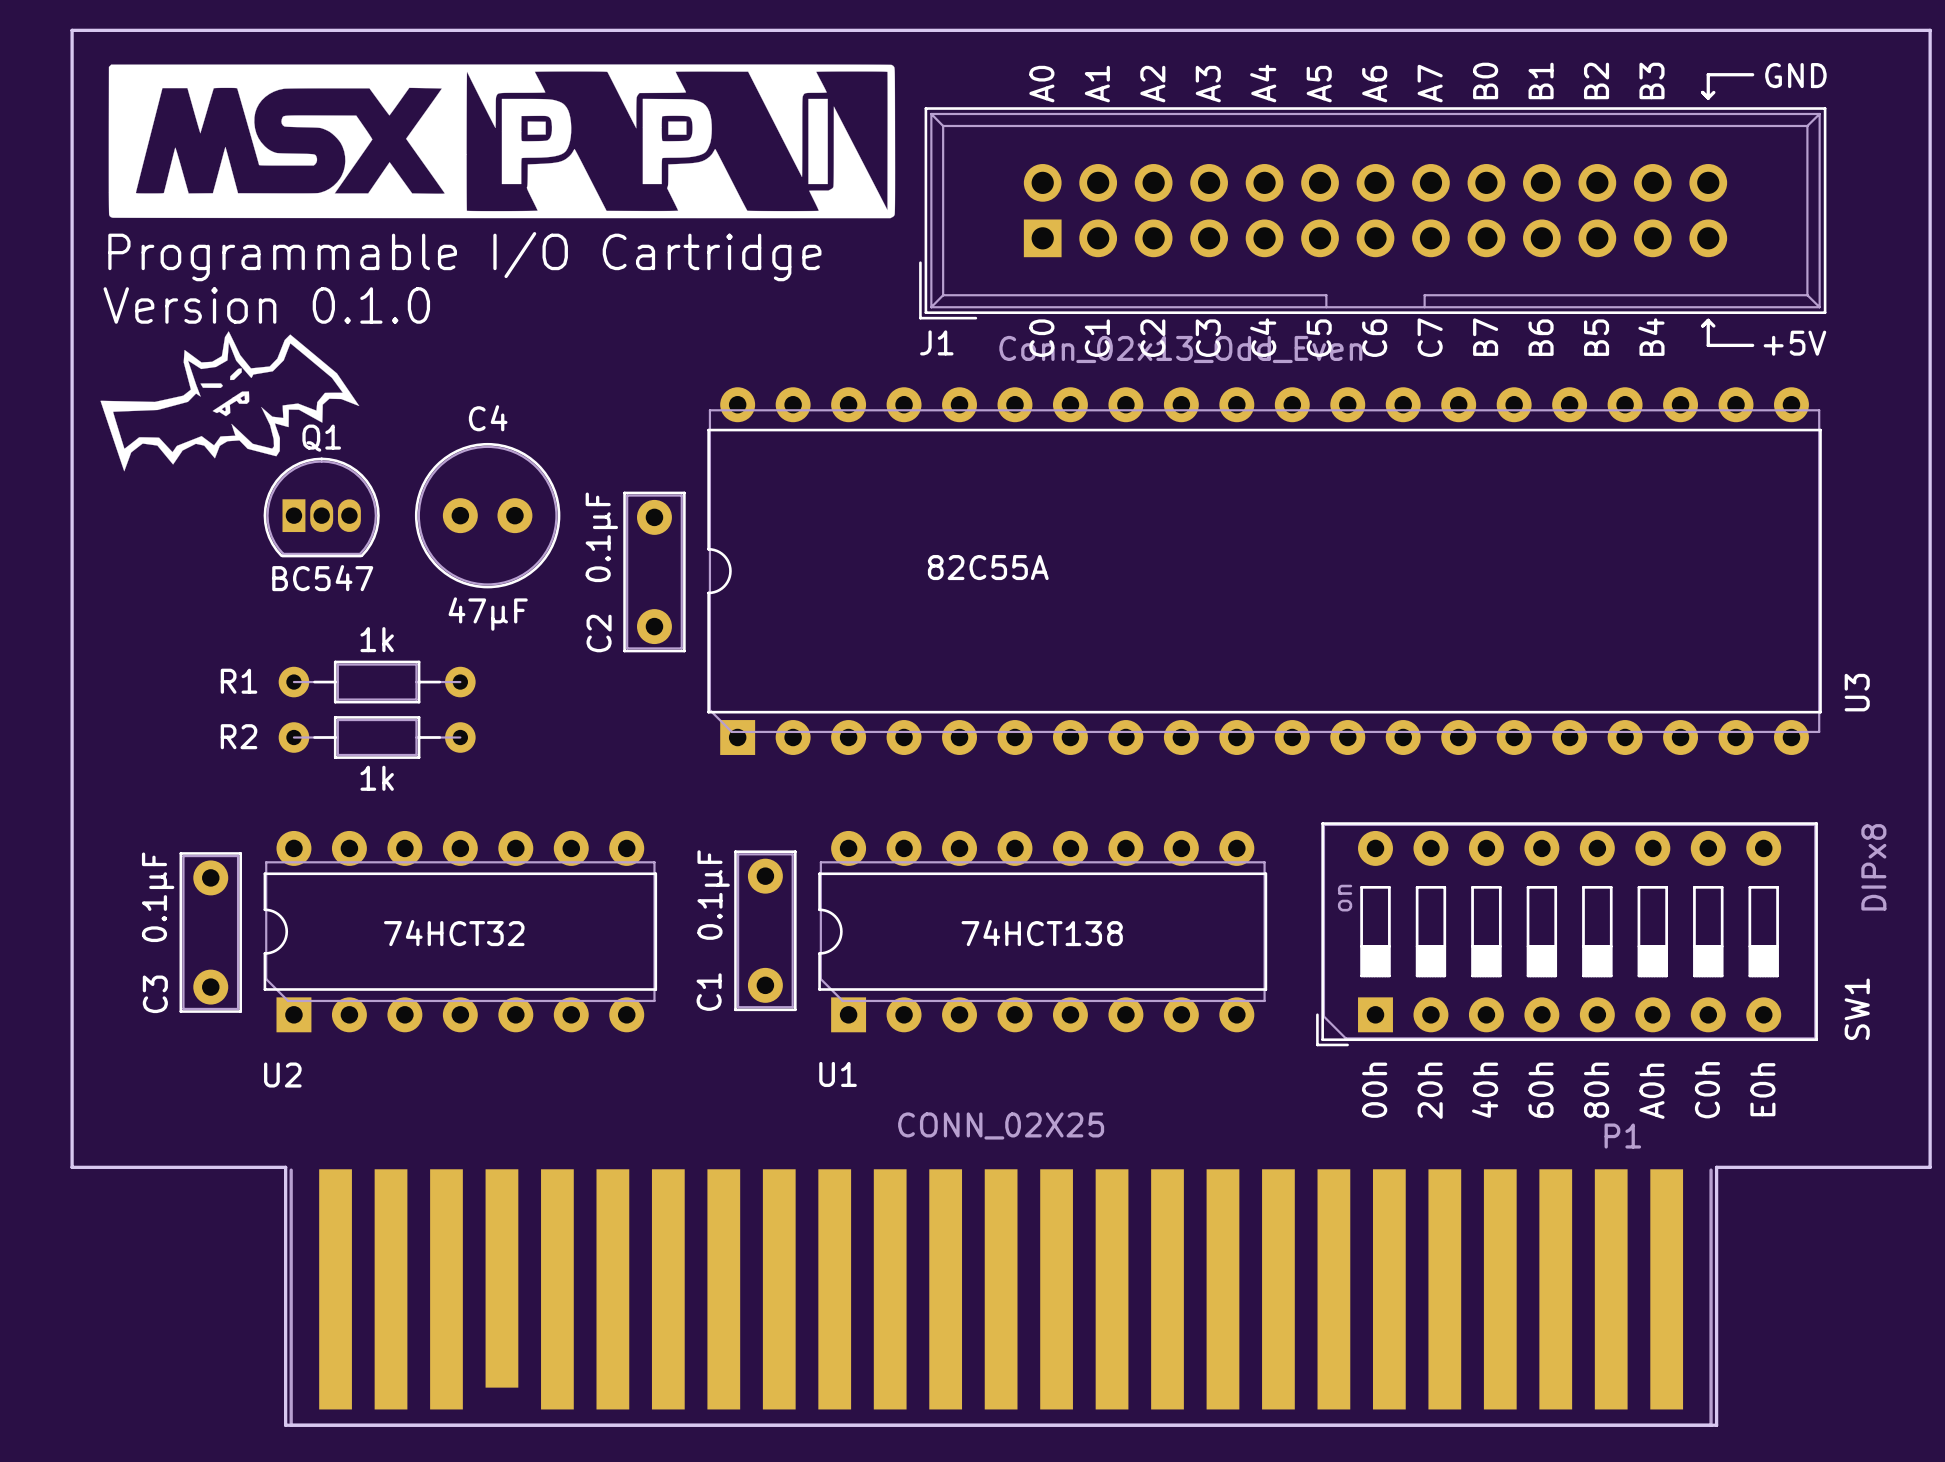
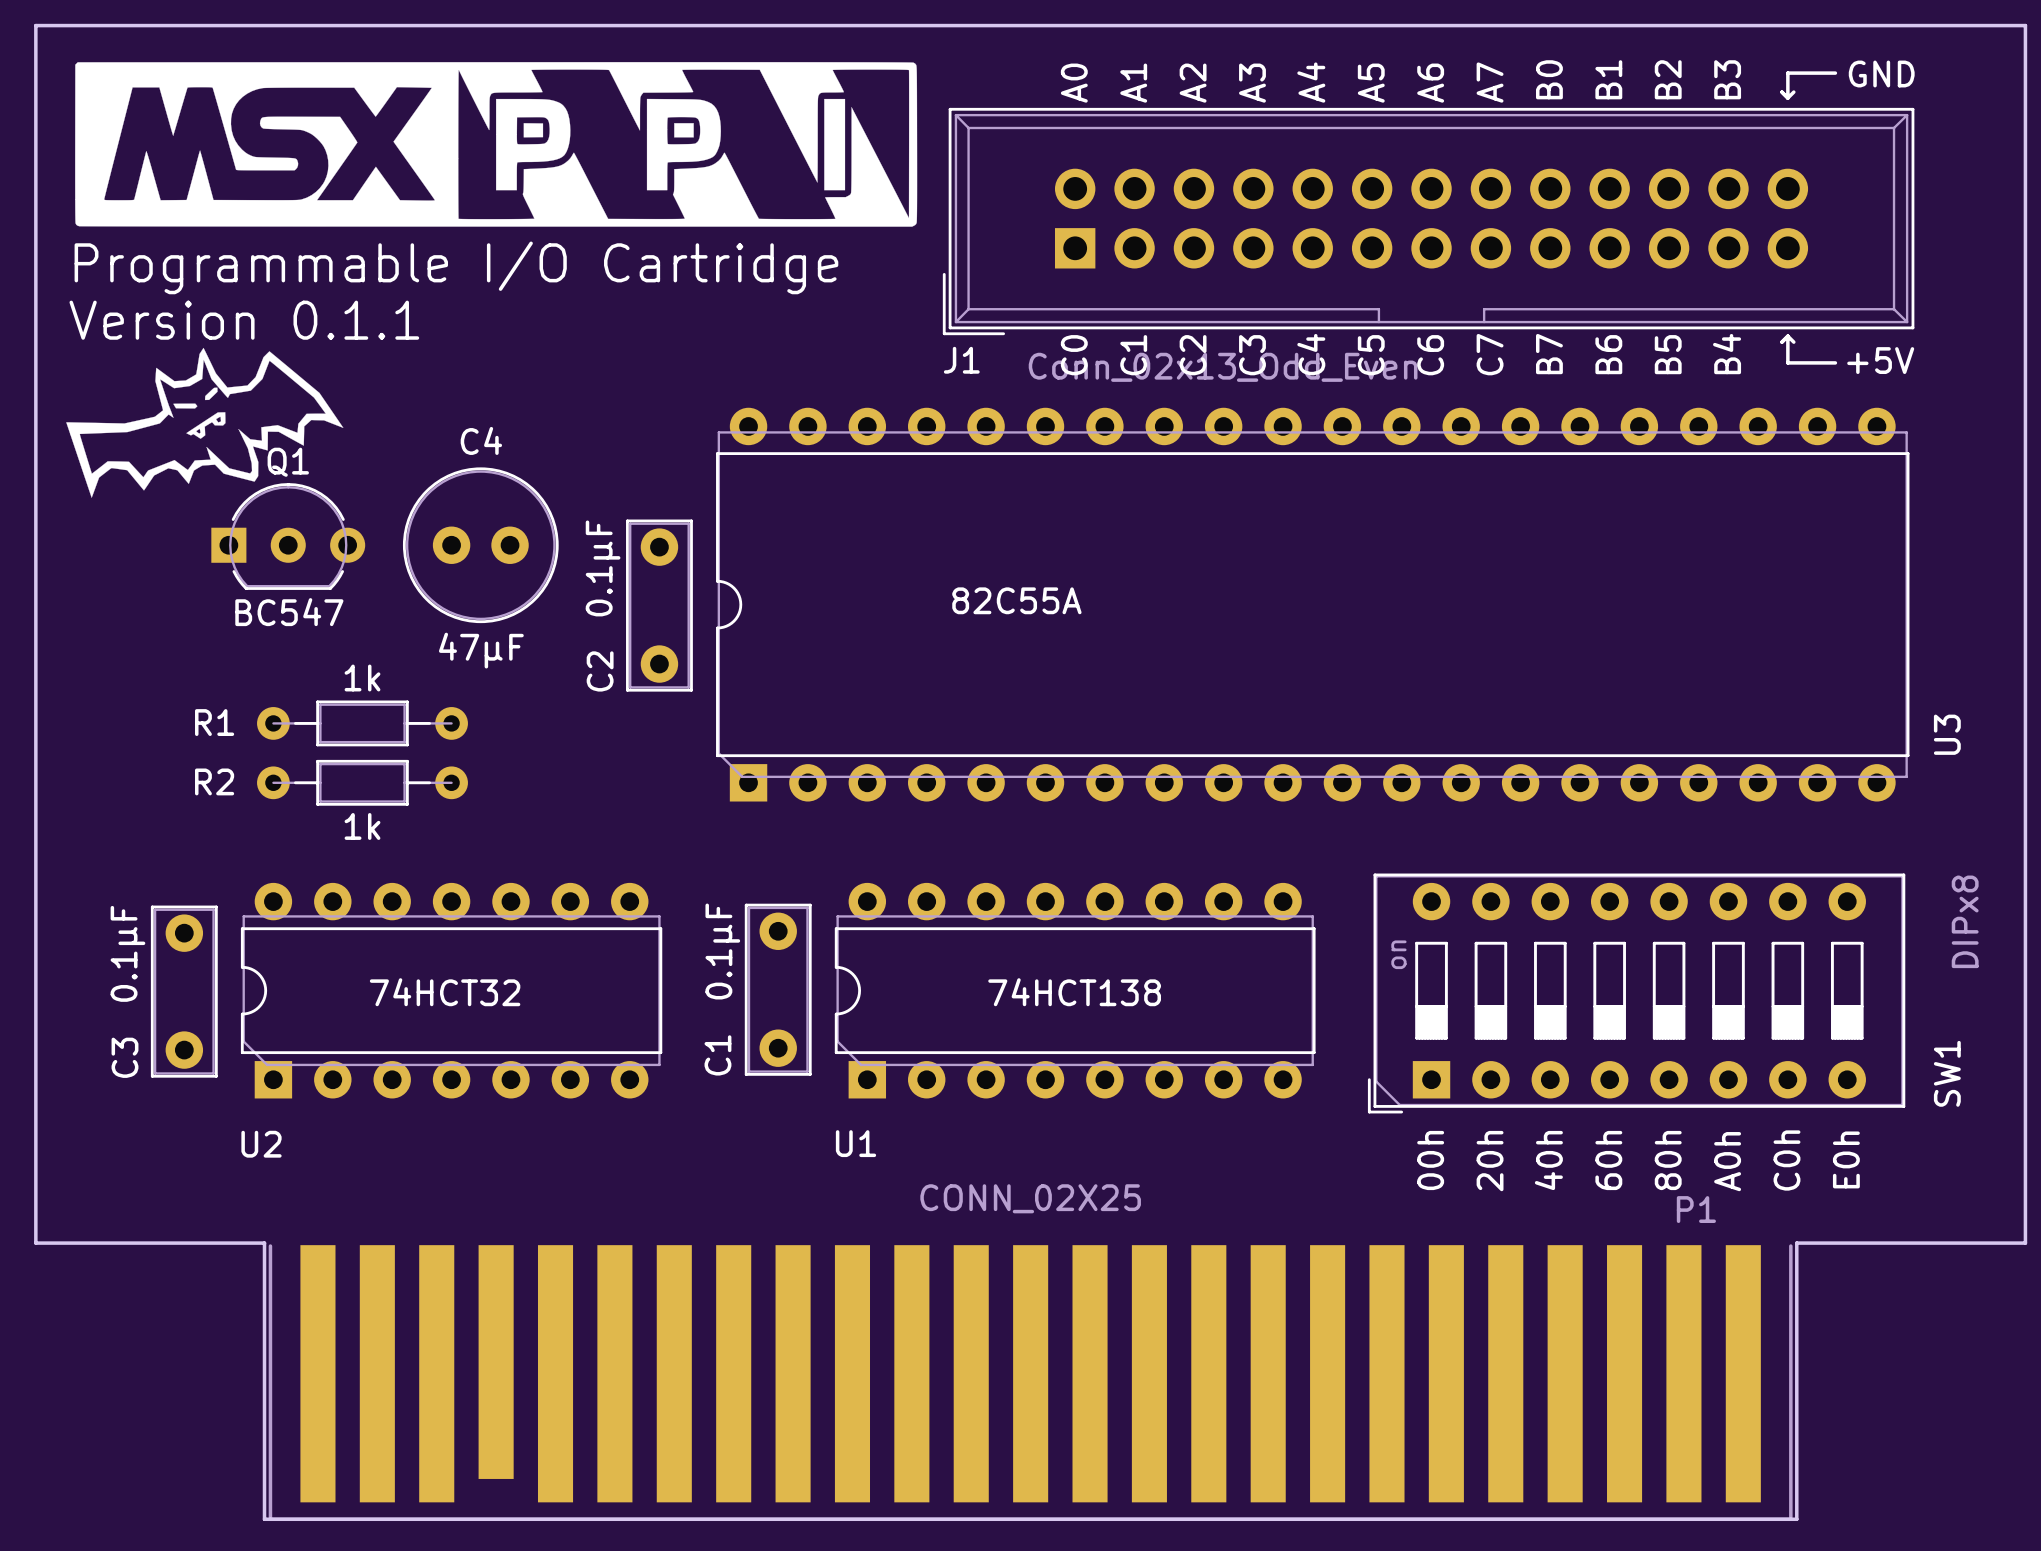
text: Version 0.1.0 (266, 305) -> Version 0.1.1 (244, 320)
Q1 footprint: [263, 457, 380, 558] -> [211, 483, 366, 590]

